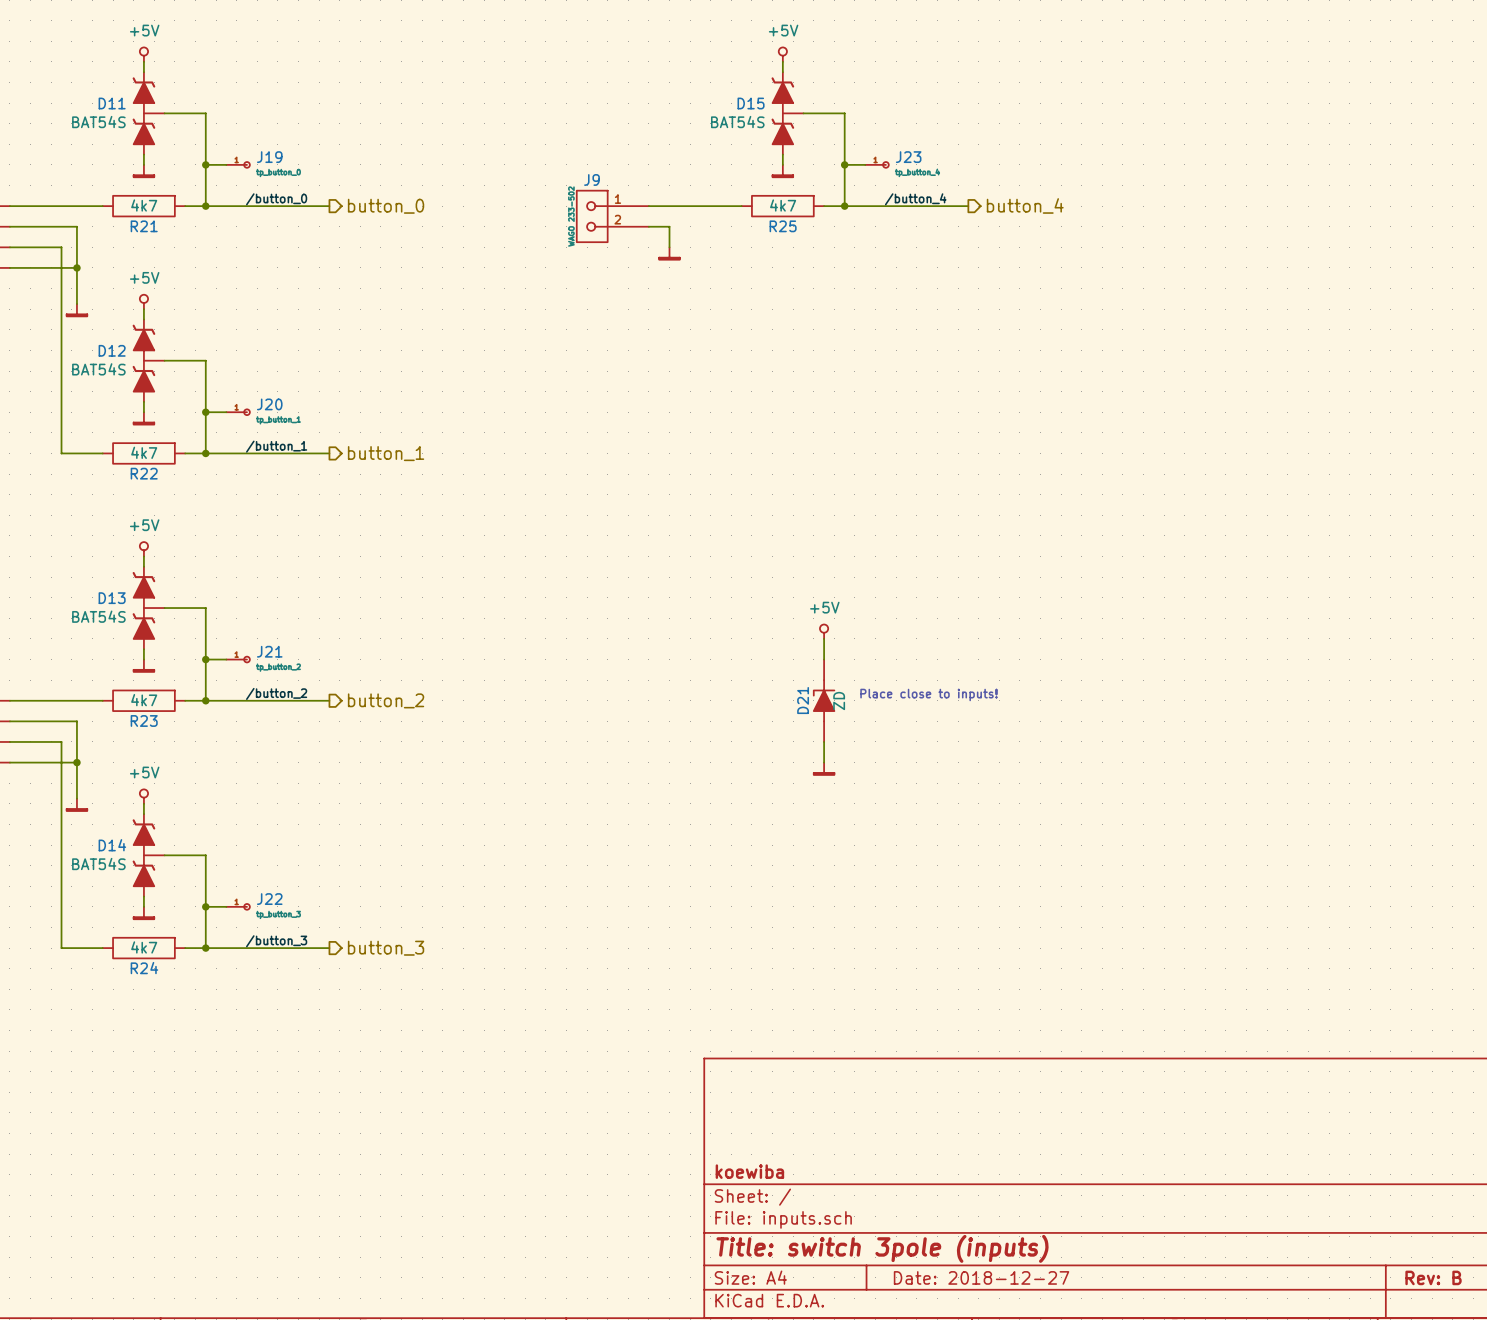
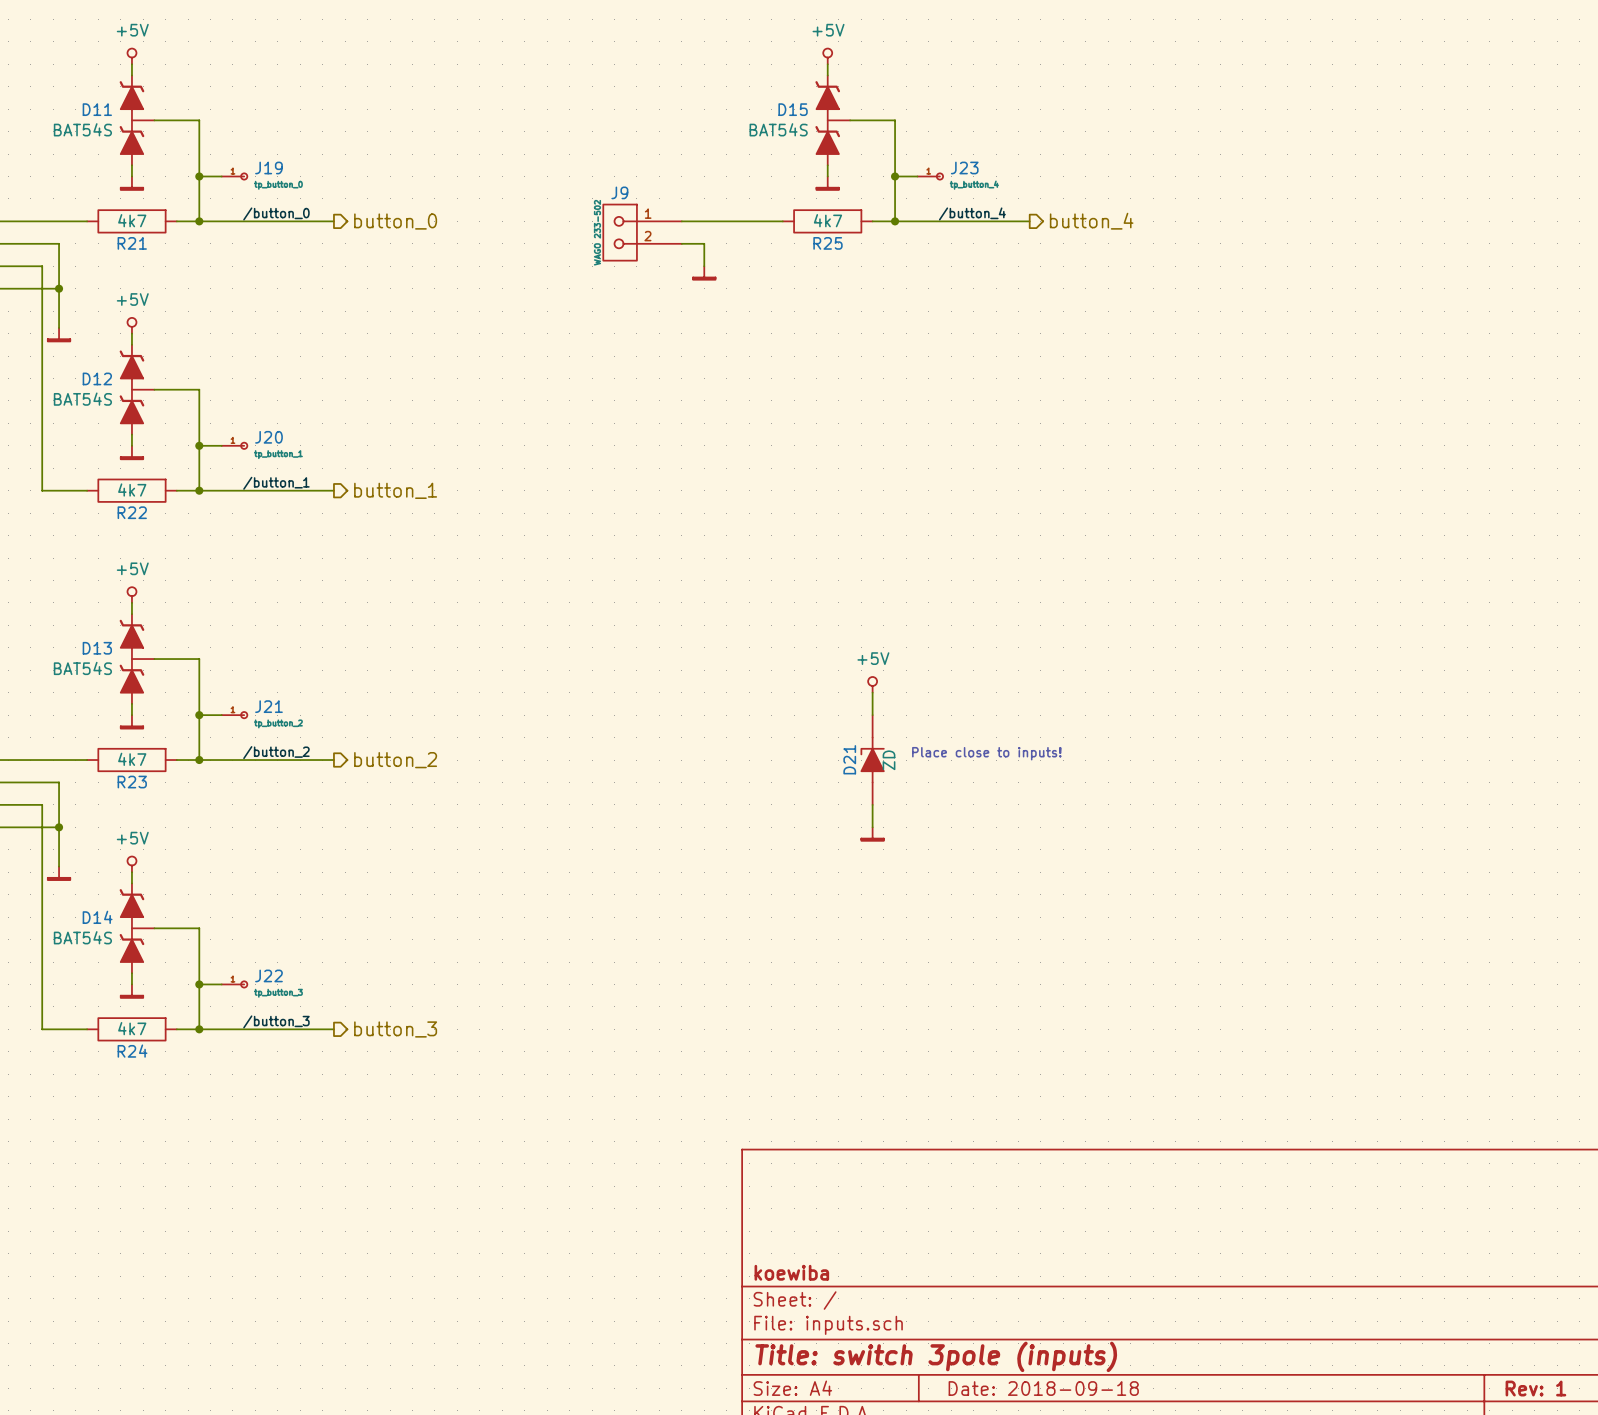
title block: Date: 2018-12-27 (981, 1277) -> Date: 2018-09-18 (1043, 1388)
title block: Rev: B (1433, 1277) -> Rev: 1 (1535, 1388)

